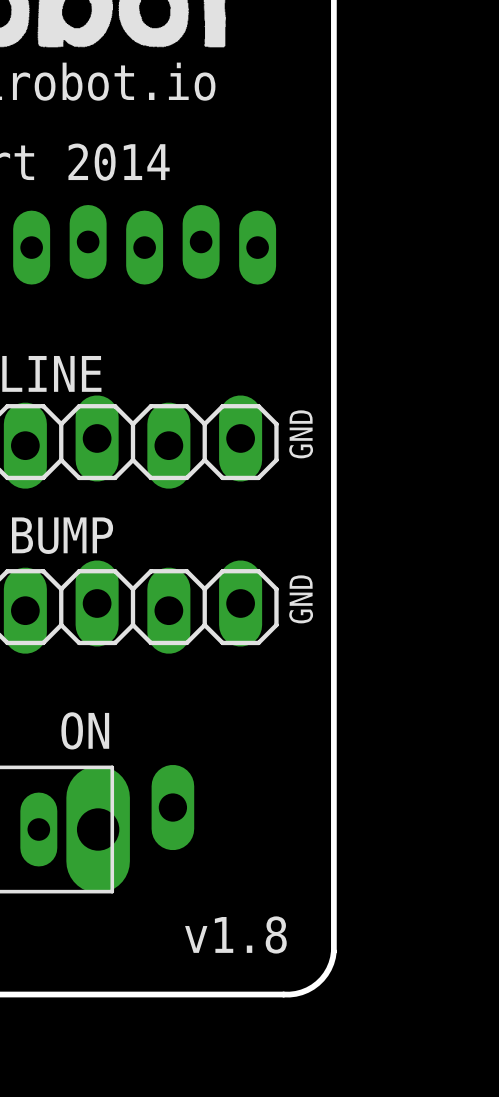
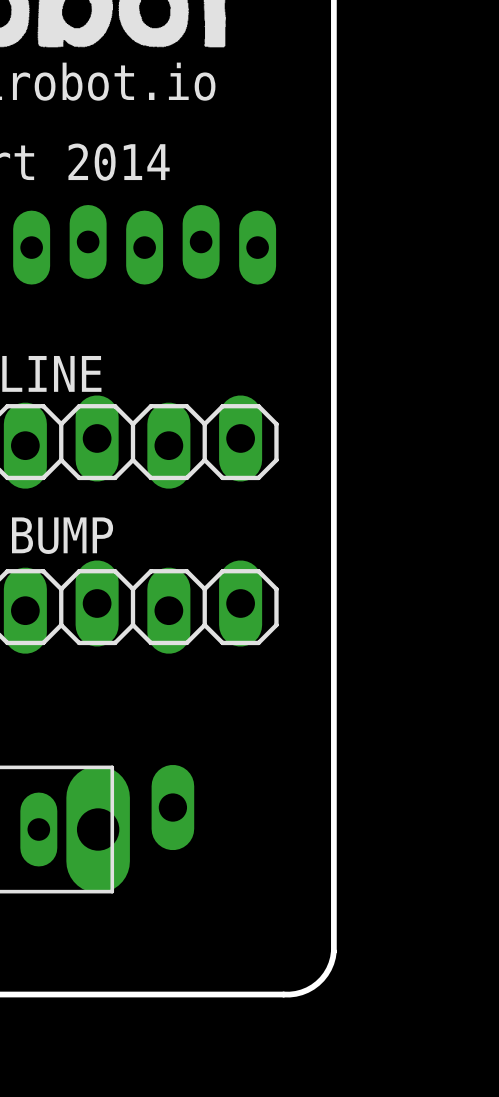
text: GND (301, 434) -> none
text: GND (301, 599) -> none
text: ON (85, 730) -> none
text: v1.8 (235, 934) -> none

